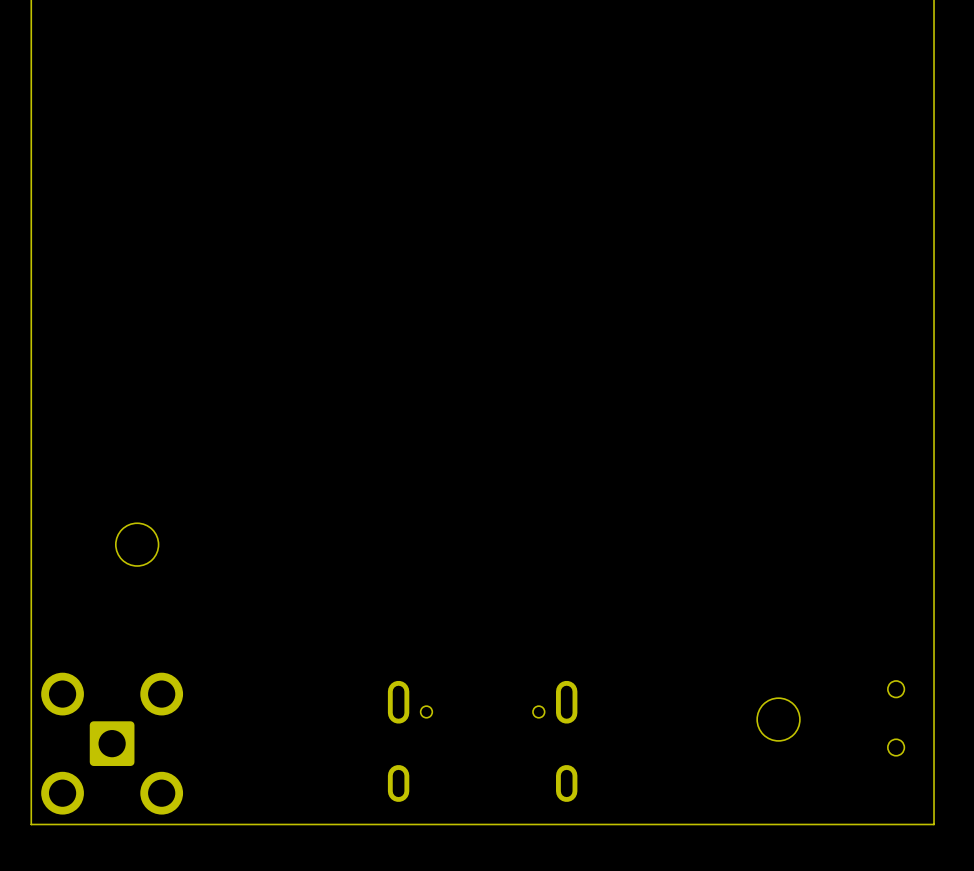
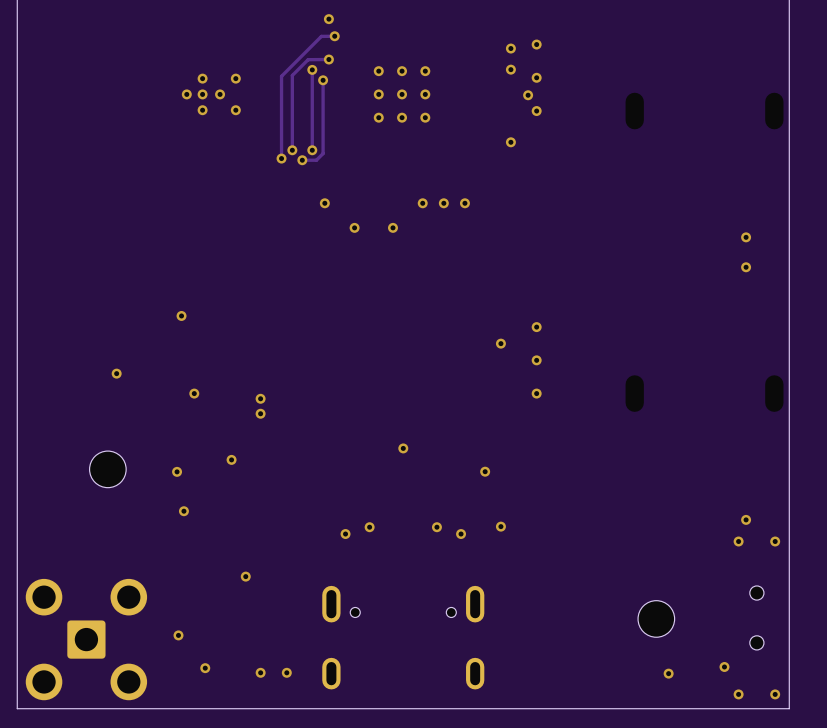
via: none -> (328, 19)
track: none -> (334, 36) (321, 36) (281, 76) (281, 158)
via: none -> (334, 36)
via: none -> (536, 44)
via: none -> (510, 48)
track: none -> (328, 59) (308, 59) (292, 75) (292, 150)
via: none -> (328, 59)
track: none -> (312, 69) (312, 150)
via: none -> (312, 69)
via: none -> (510, 69)
via: none -> (378, 71)
via: none -> (402, 71)
via: none -> (425, 71)
via: none -> (536, 77)
via: none -> (202, 78)
via: none -> (235, 78)
track: none -> (323, 80) (323, 153) (316, 160) (302, 160)
via: none -> (323, 80)
via: none -> (186, 94)
via: none -> (202, 94)
via: none -> (220, 94)
via: none -> (378, 94)
via: none -> (402, 94)
via: none -> (425, 94)
via: none -> (528, 95)
via: none -> (202, 110)
via: none -> (235, 110)
via: none -> (536, 111)
via: none -> (378, 117)
via: none -> (402, 117)
via: none -> (425, 117)
via: none -> (510, 142)
via: none -> (292, 150)
via: none -> (312, 150)
via: none -> (281, 158)
via: none -> (302, 160)
via: none -> (324, 203)
via: none -> (422, 203)
via: none -> (443, 203)
via: none -> (464, 203)
via: none -> (354, 227)
via: none -> (392, 227)
via: none -> (746, 237)
via: none -> (746, 267)
via: none -> (181, 315)
via: none -> (536, 327)
via: none -> (500, 343)
via: none -> (536, 360)
via: none -> (116, 373)
via: none -> (194, 393)
via: none -> (536, 393)
via: none -> (260, 398)
via: none -> (260, 413)
via: none -> (403, 448)
via: none -> (231, 459)
via: none -> (177, 471)
via: none -> (485, 471)
via: none -> (183, 511)
via: none -> (746, 519)
via: none -> (500, 526)
via: none -> (369, 527)
via: none -> (436, 527)
via: none -> (345, 534)
via: none -> (461, 534)
via: none -> (738, 541)
via: none -> (775, 541)
via: none -> (245, 576)
via: none -> (178, 635)
via: none -> (724, 666)
via: none -> (205, 668)
via: none -> (260, 672)
via: none -> (286, 672)
via: none -> (668, 673)
via: none -> (738, 694)
via: none -> (775, 694)

